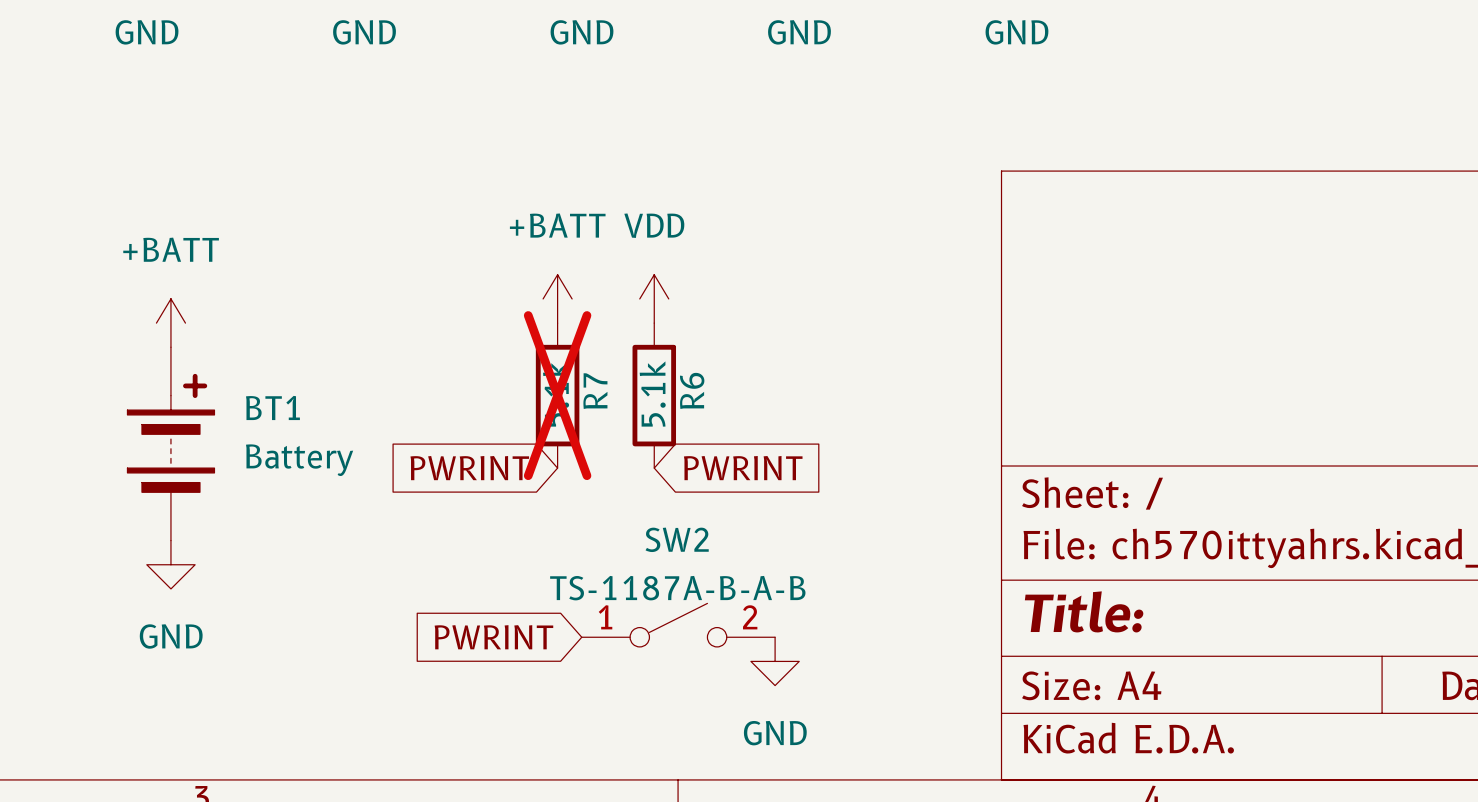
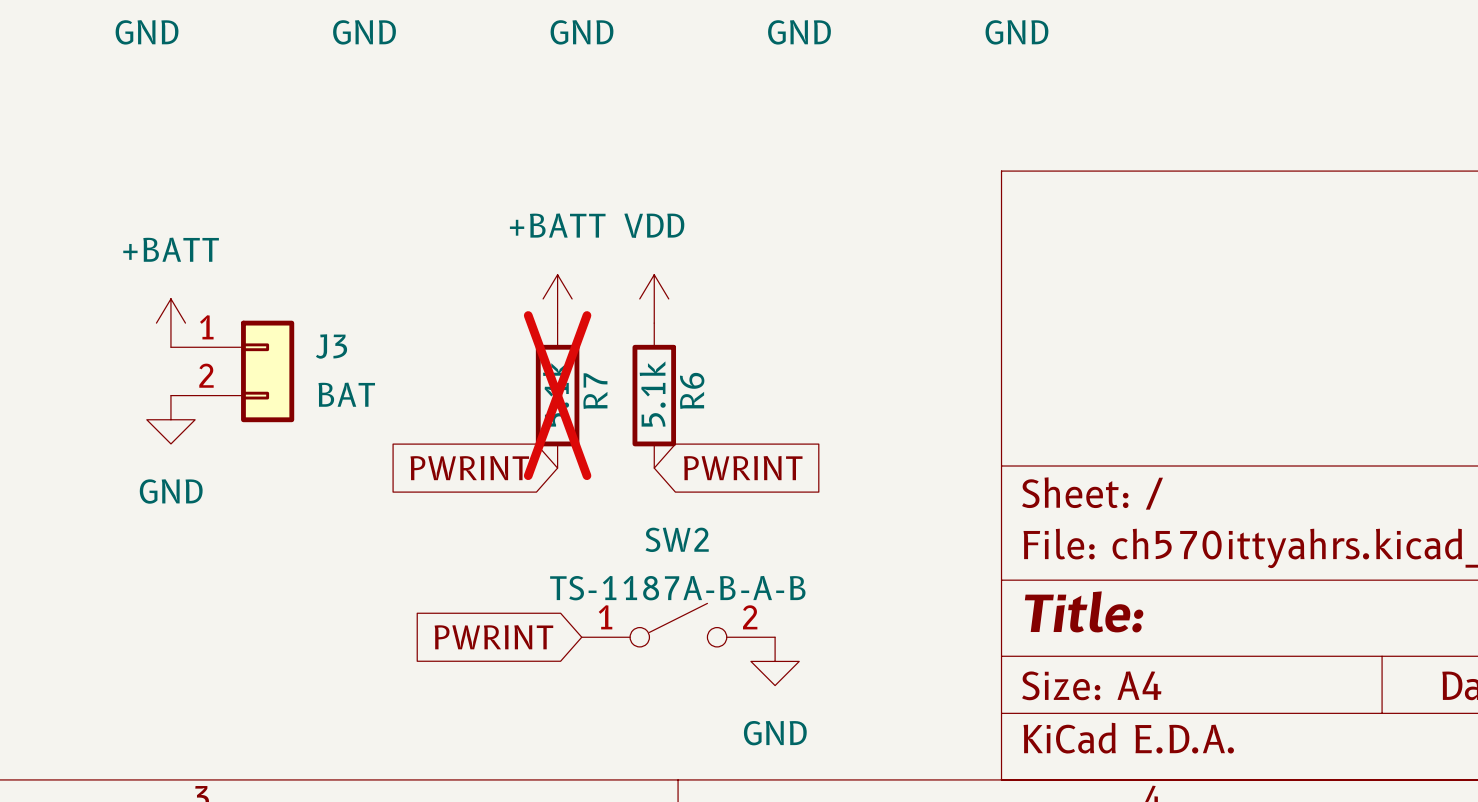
J3: none -> BAT (232, 371)
BT1: Battery (170, 443) -> none
power symbol position: GND (170, 564) -> GND (170, 419)

